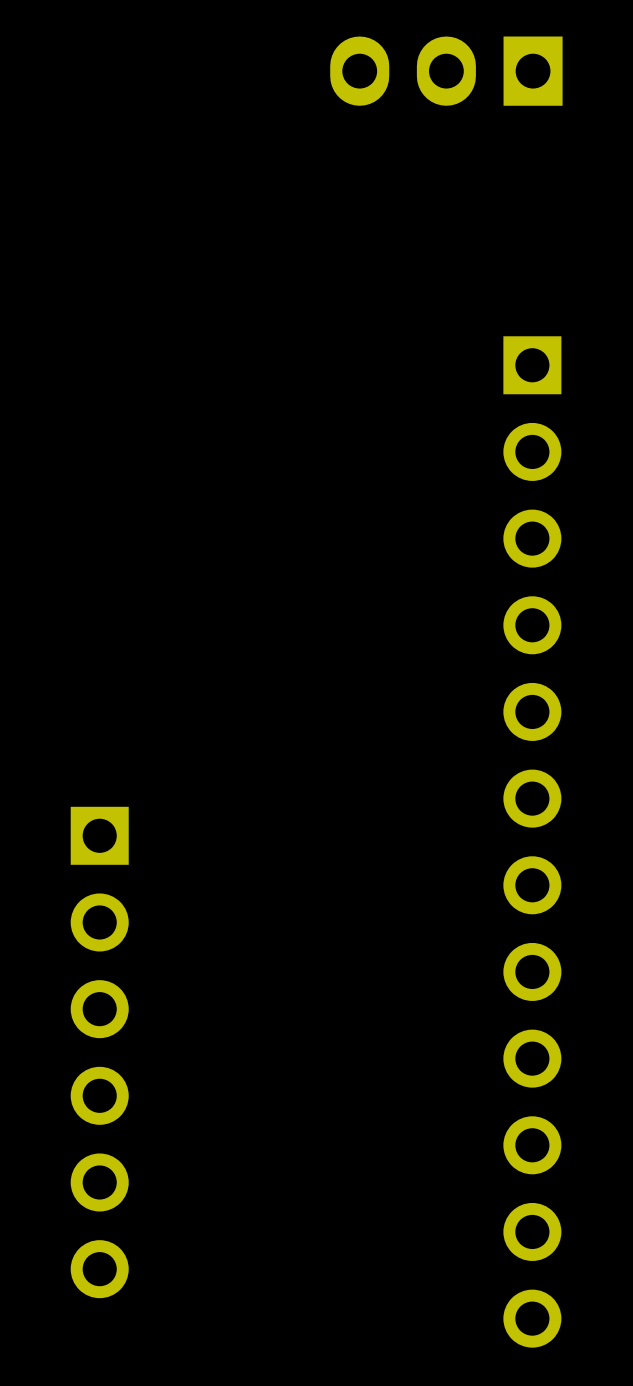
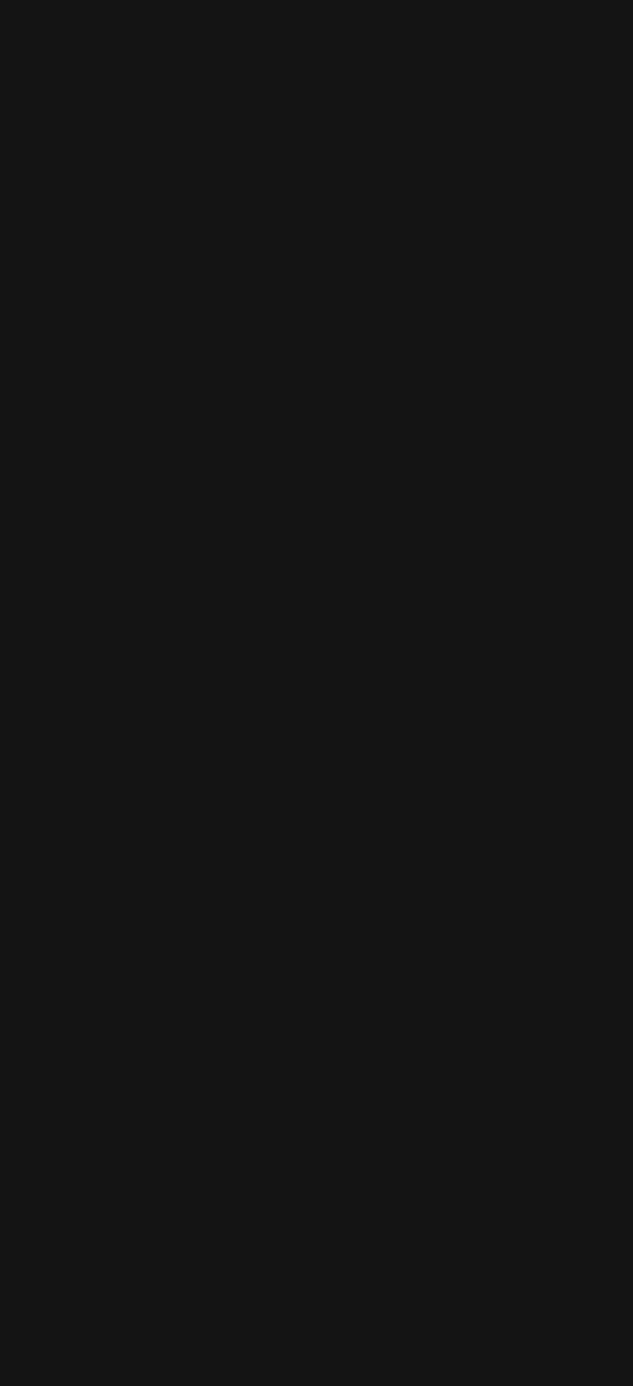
part: (446, 71) -> none
part: (532, 841) -> none
part: (99, 1052) -> none

